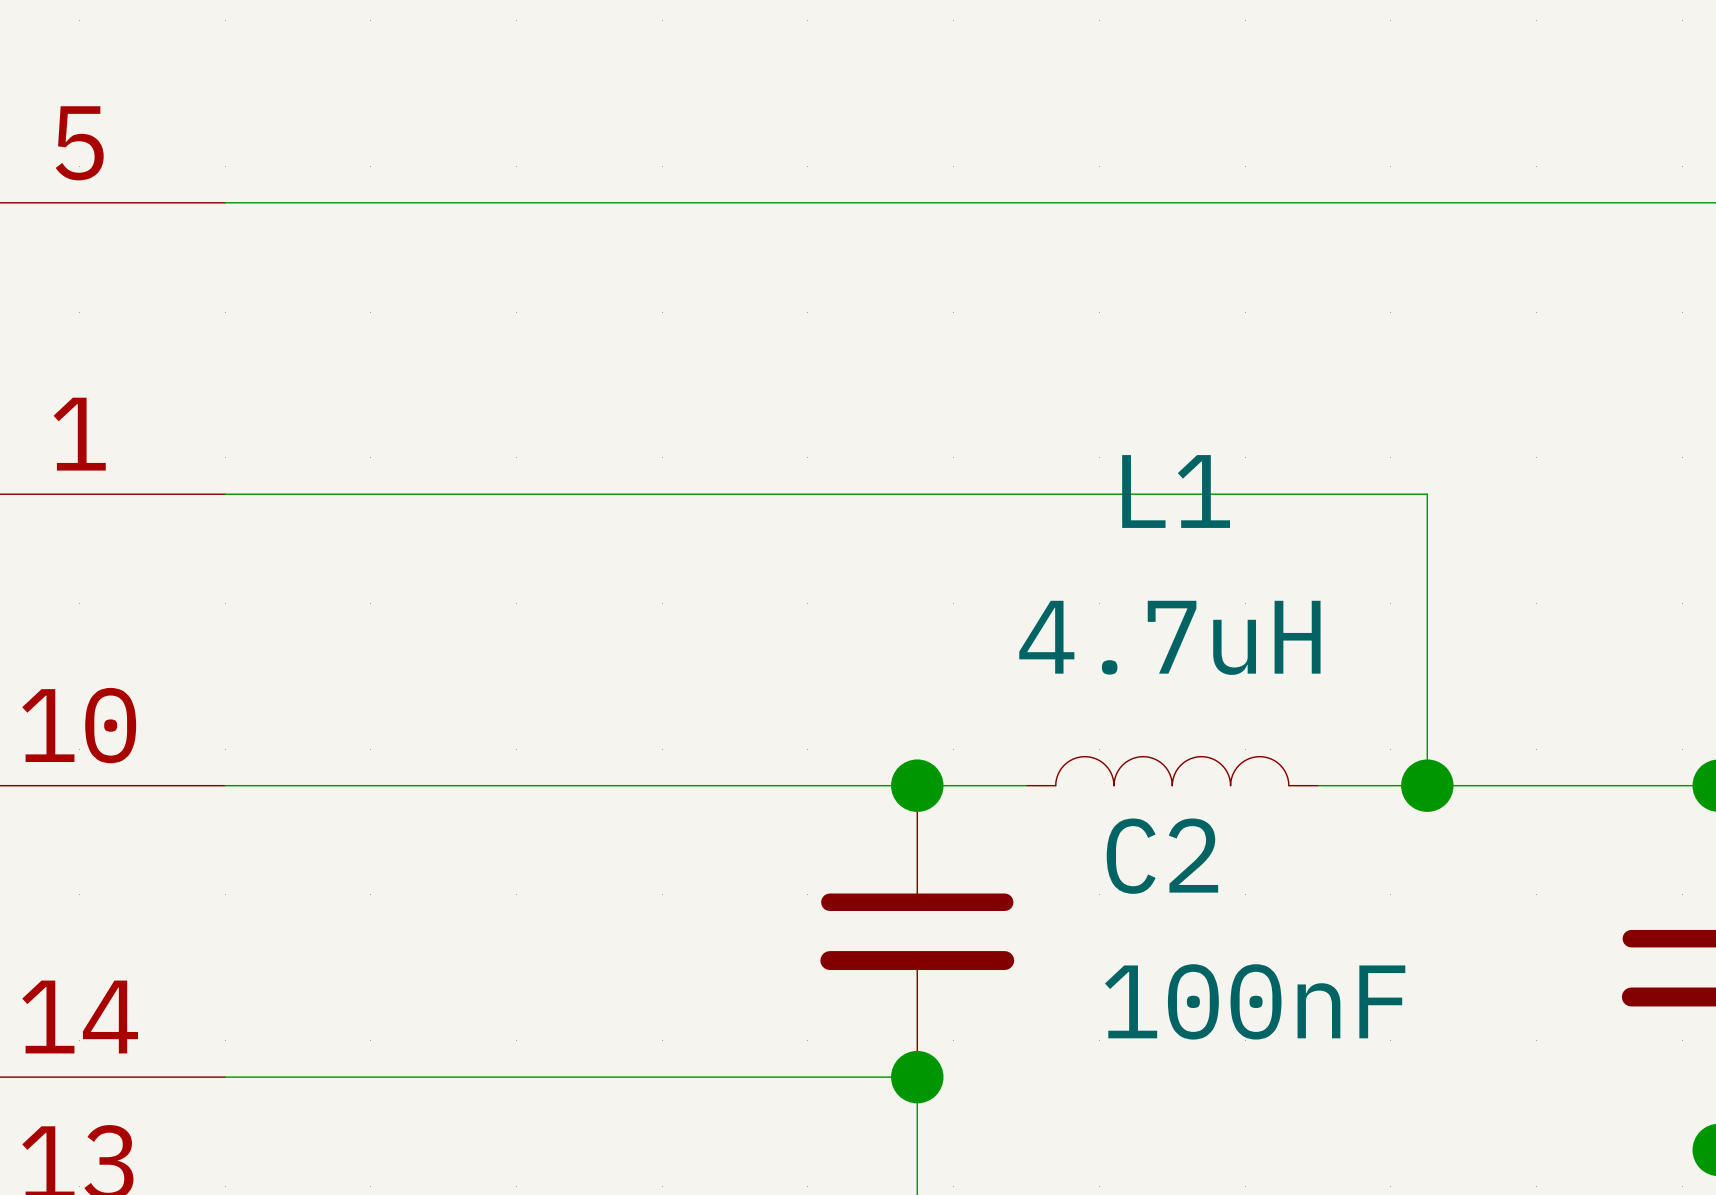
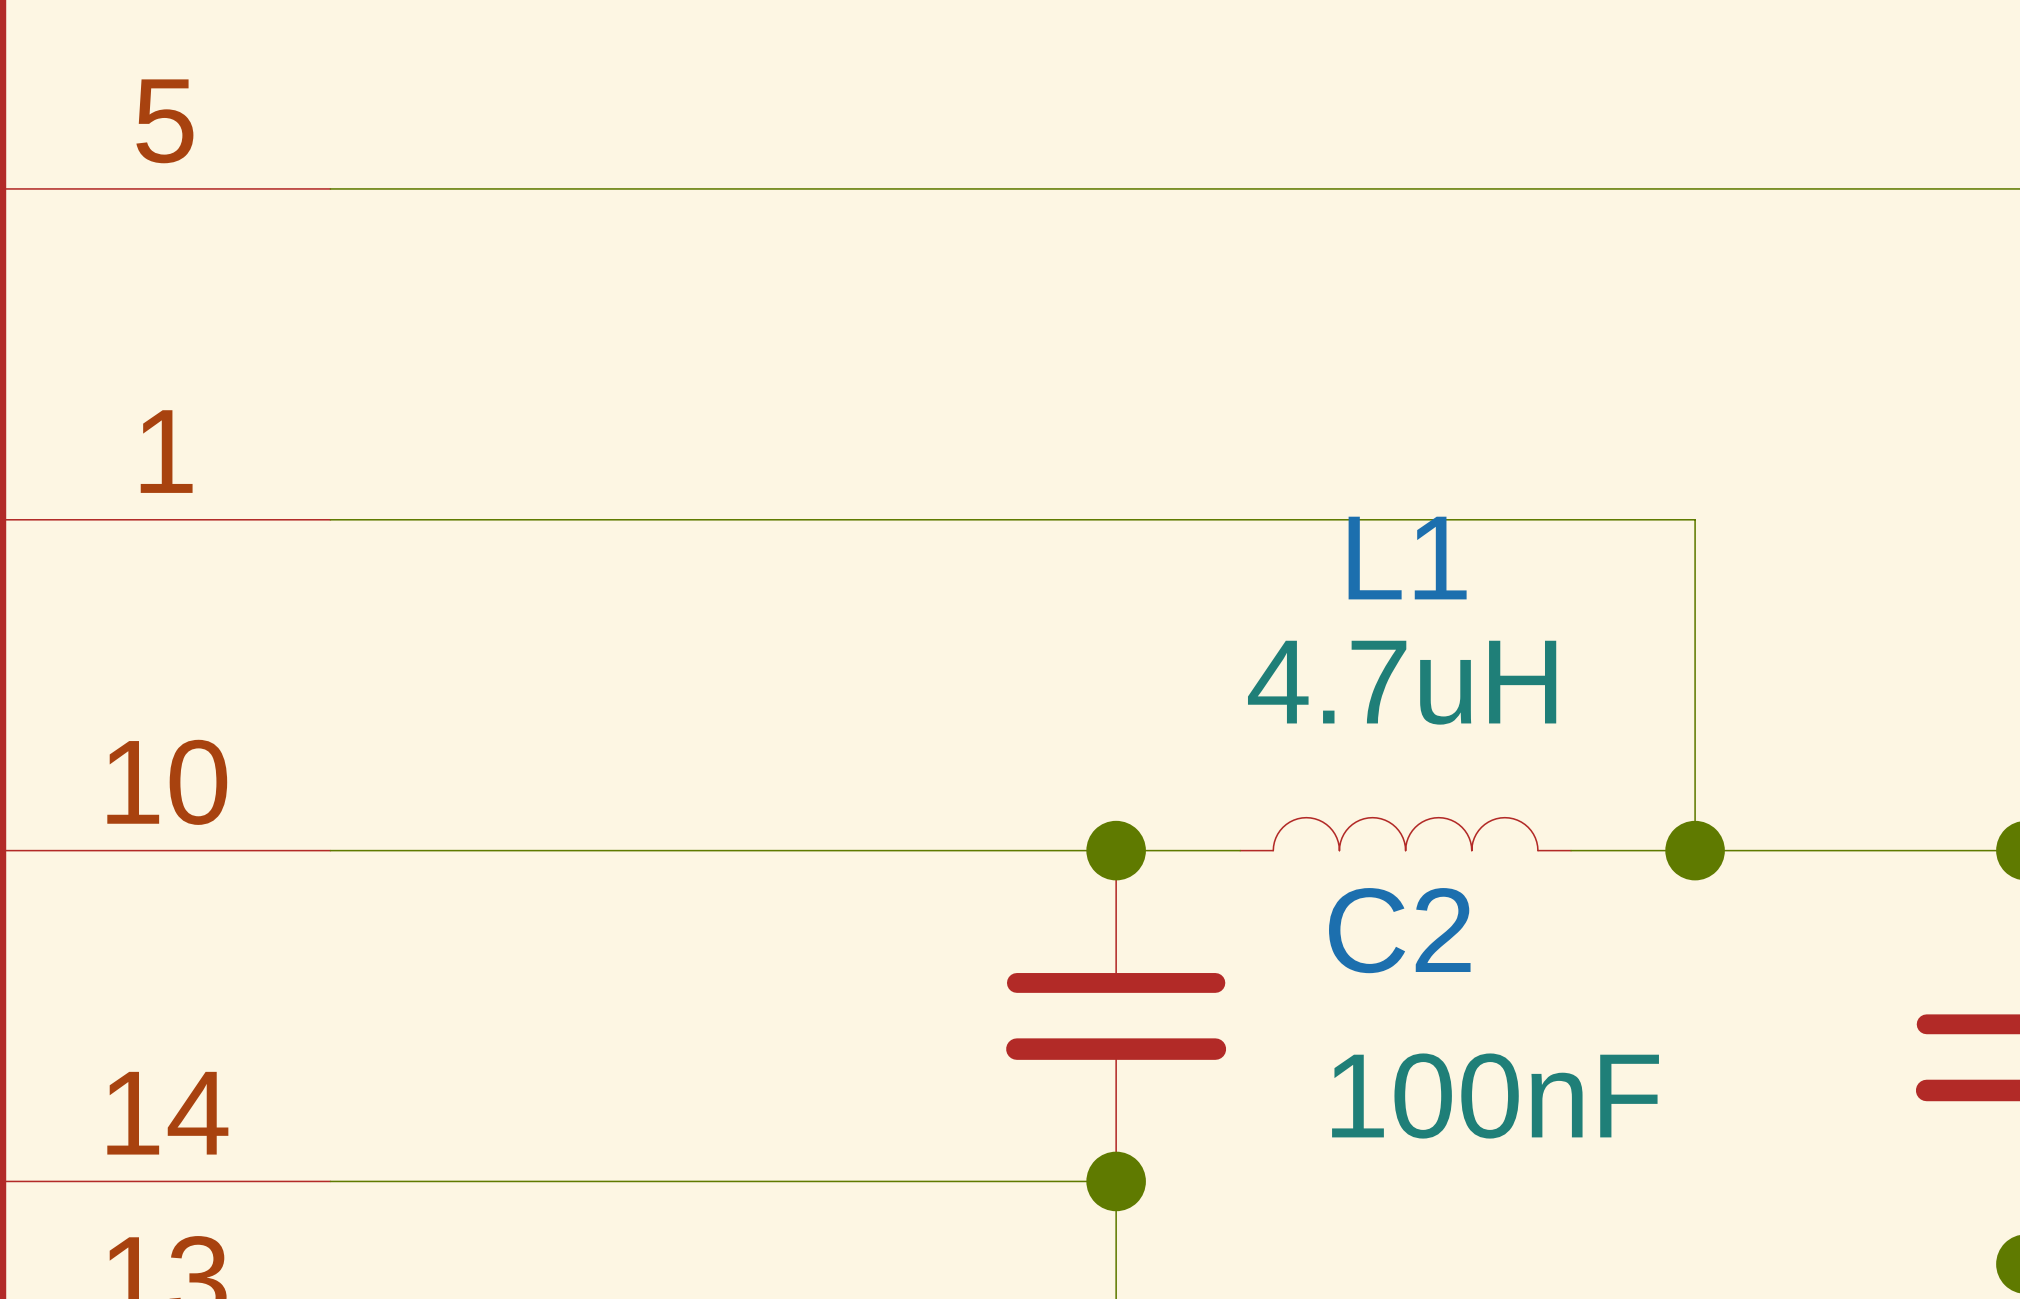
L1 name position: L1 (1176, 491) -> L1 (1407, 558)

